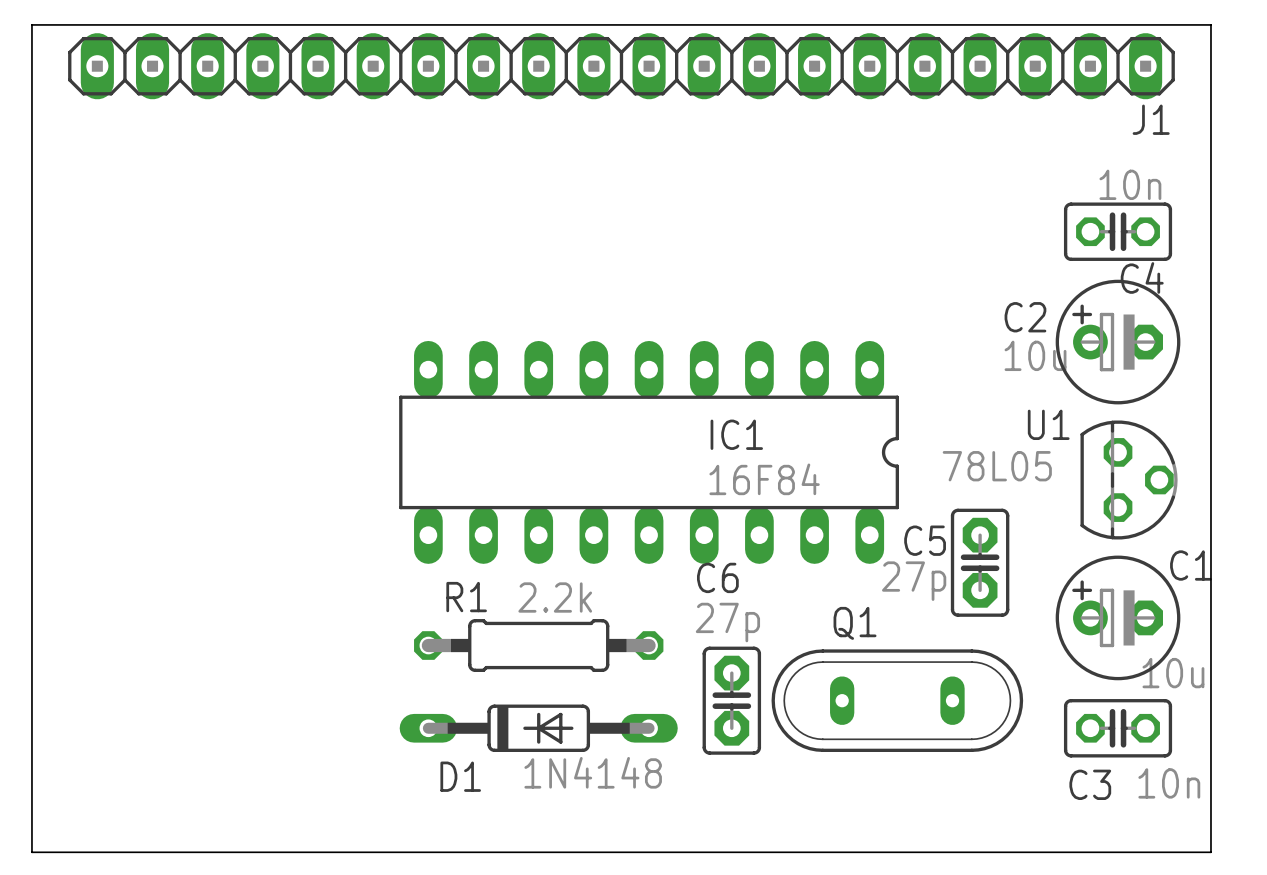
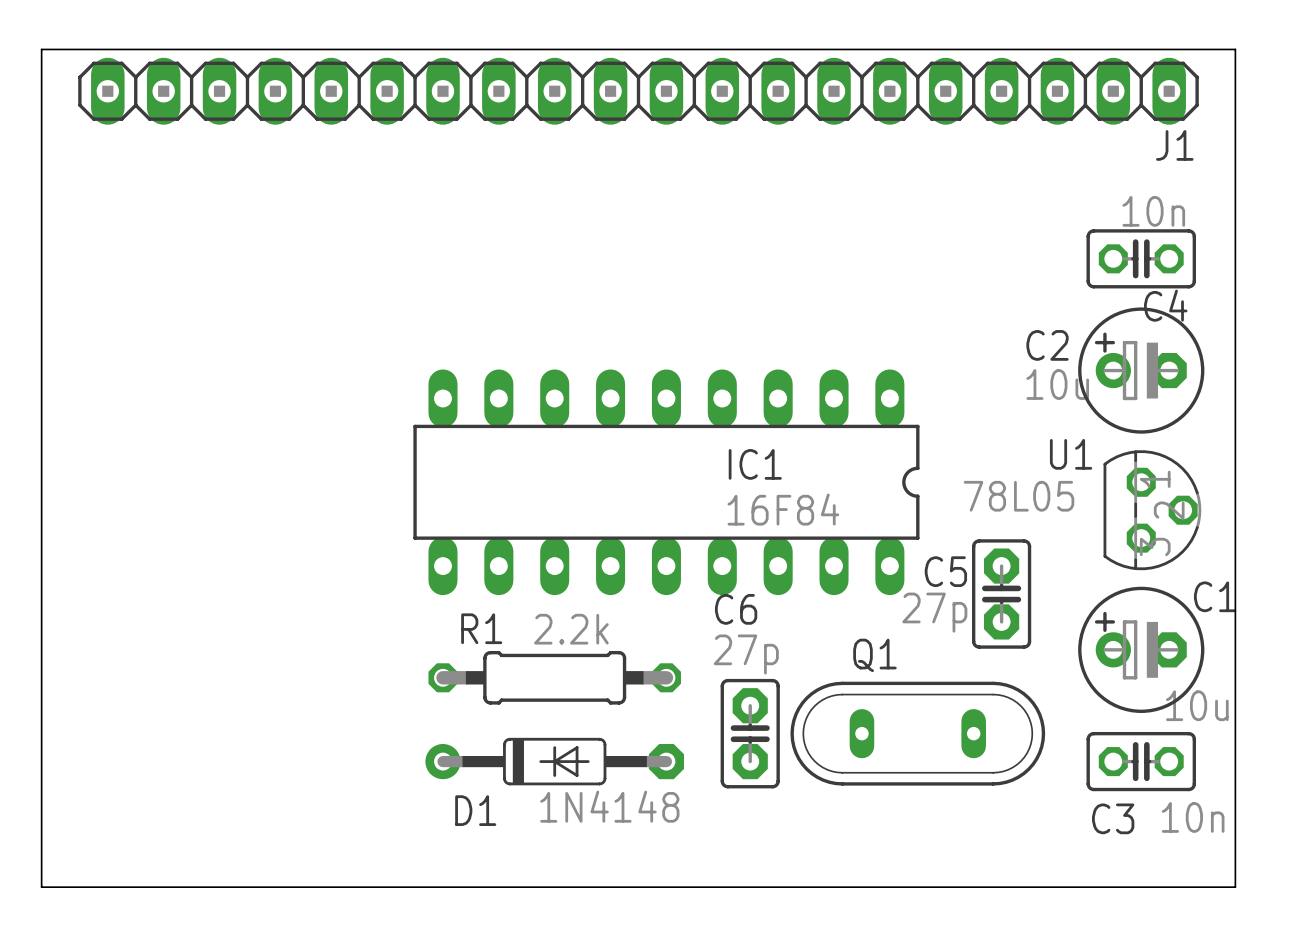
U1 footprint: [1080, 420, 1178, 540] -> [1103, 450, 1202, 571]
D1 footprint: [399, 704, 678, 752] -> [425, 737, 685, 786]

